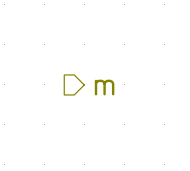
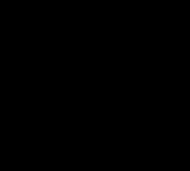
hierarchical label: m (104, 87) -> none

